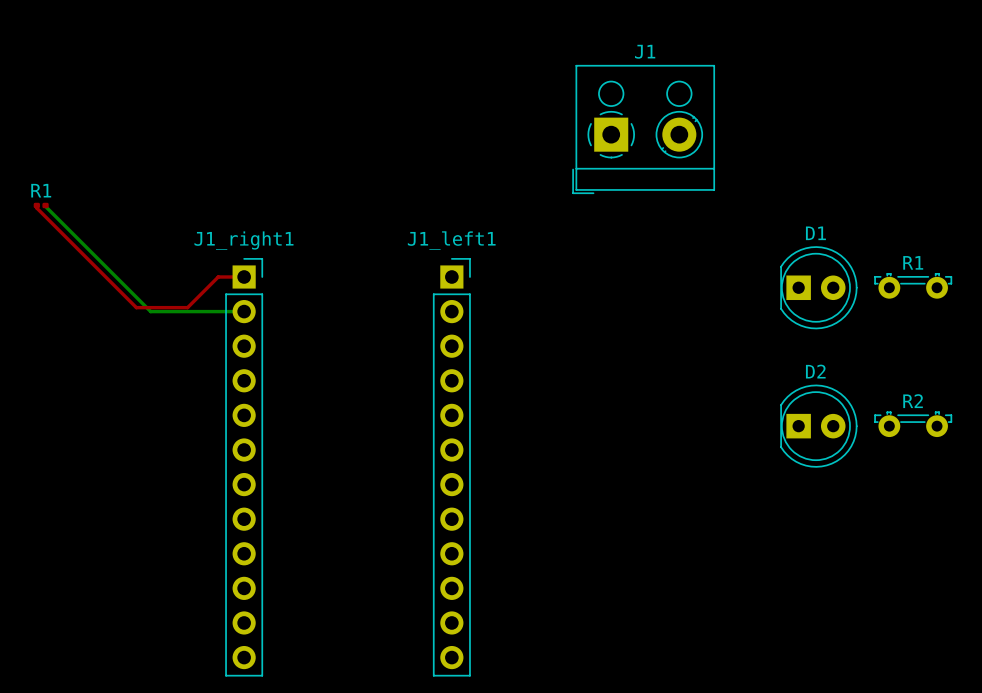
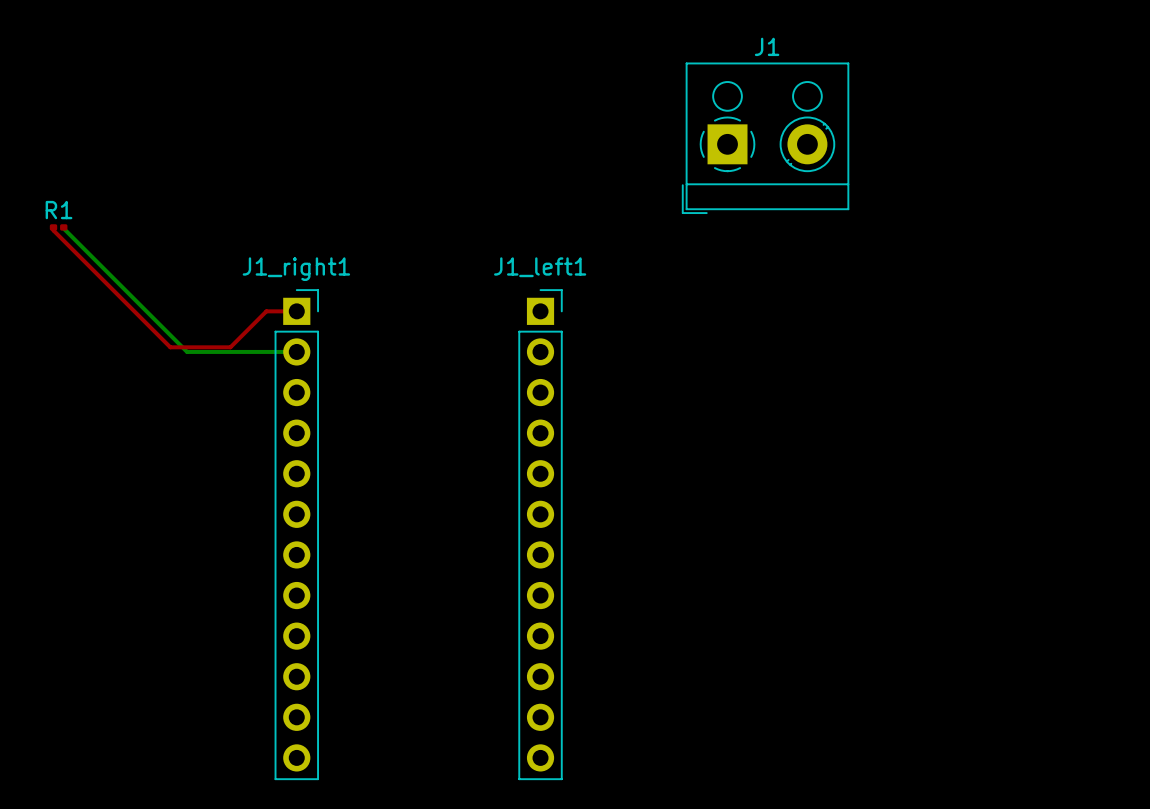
R1: (913, 285) -> none
D1: (818, 287) -> none
R2: (913, 424) -> none
D2: (818, 426) -> none

